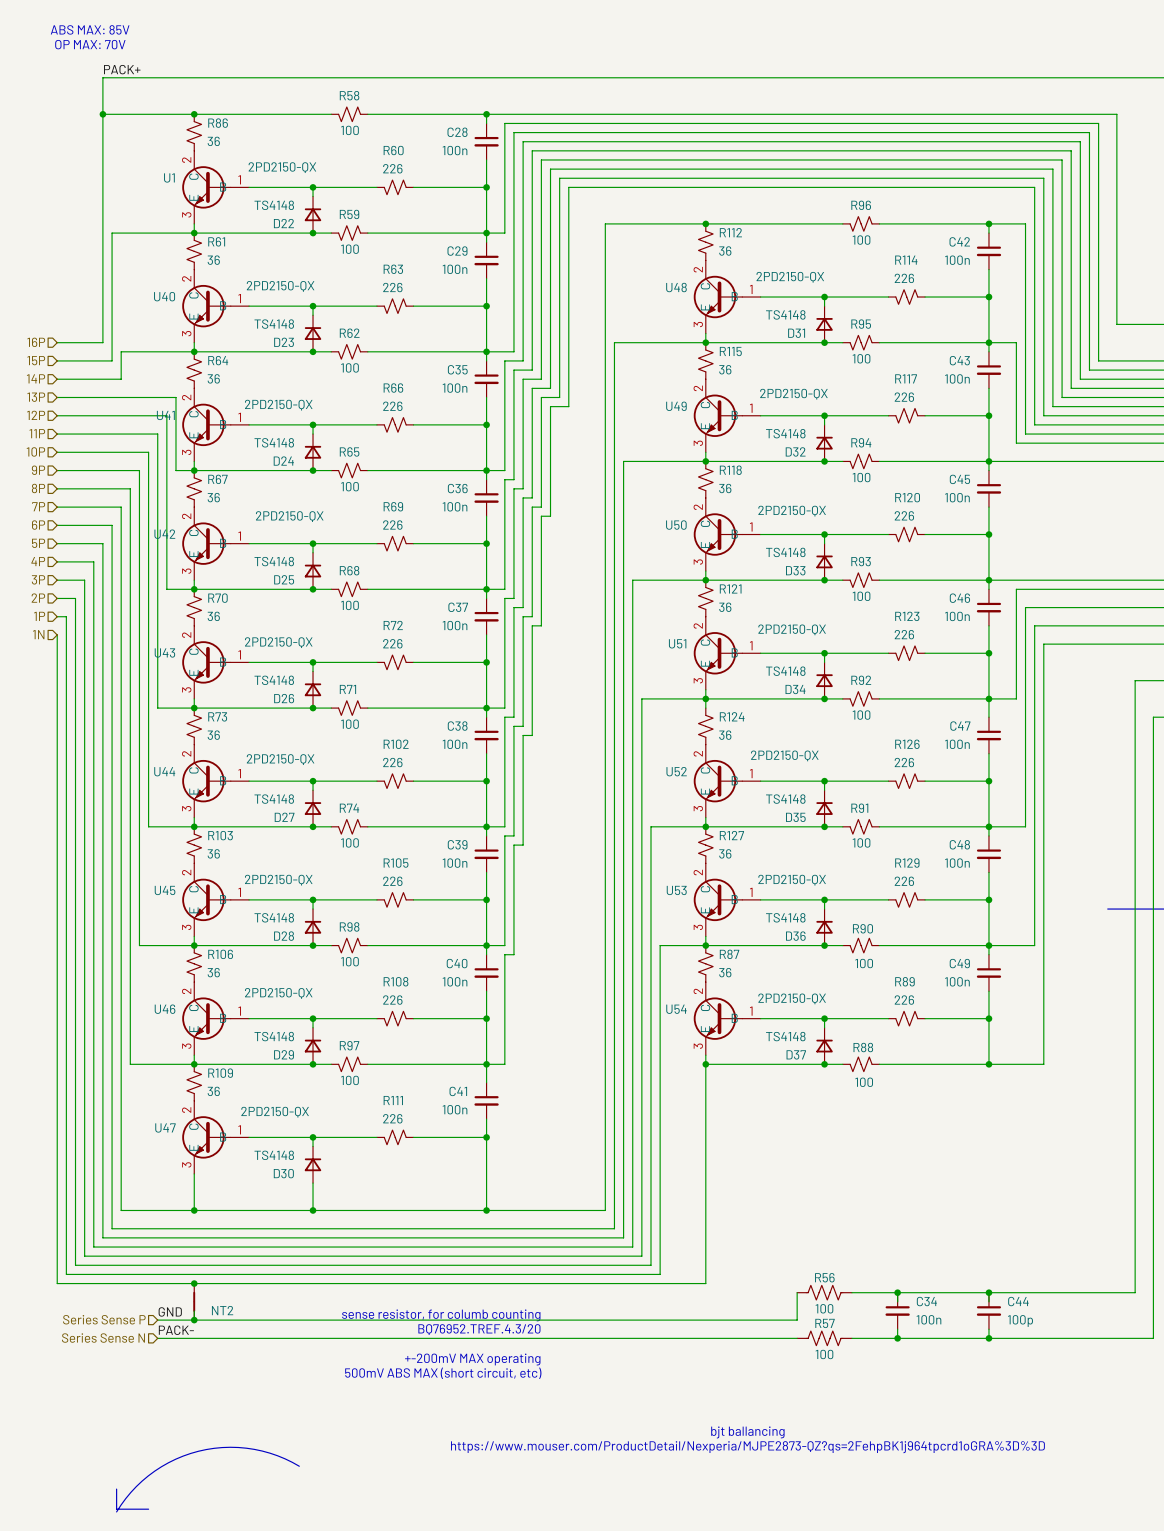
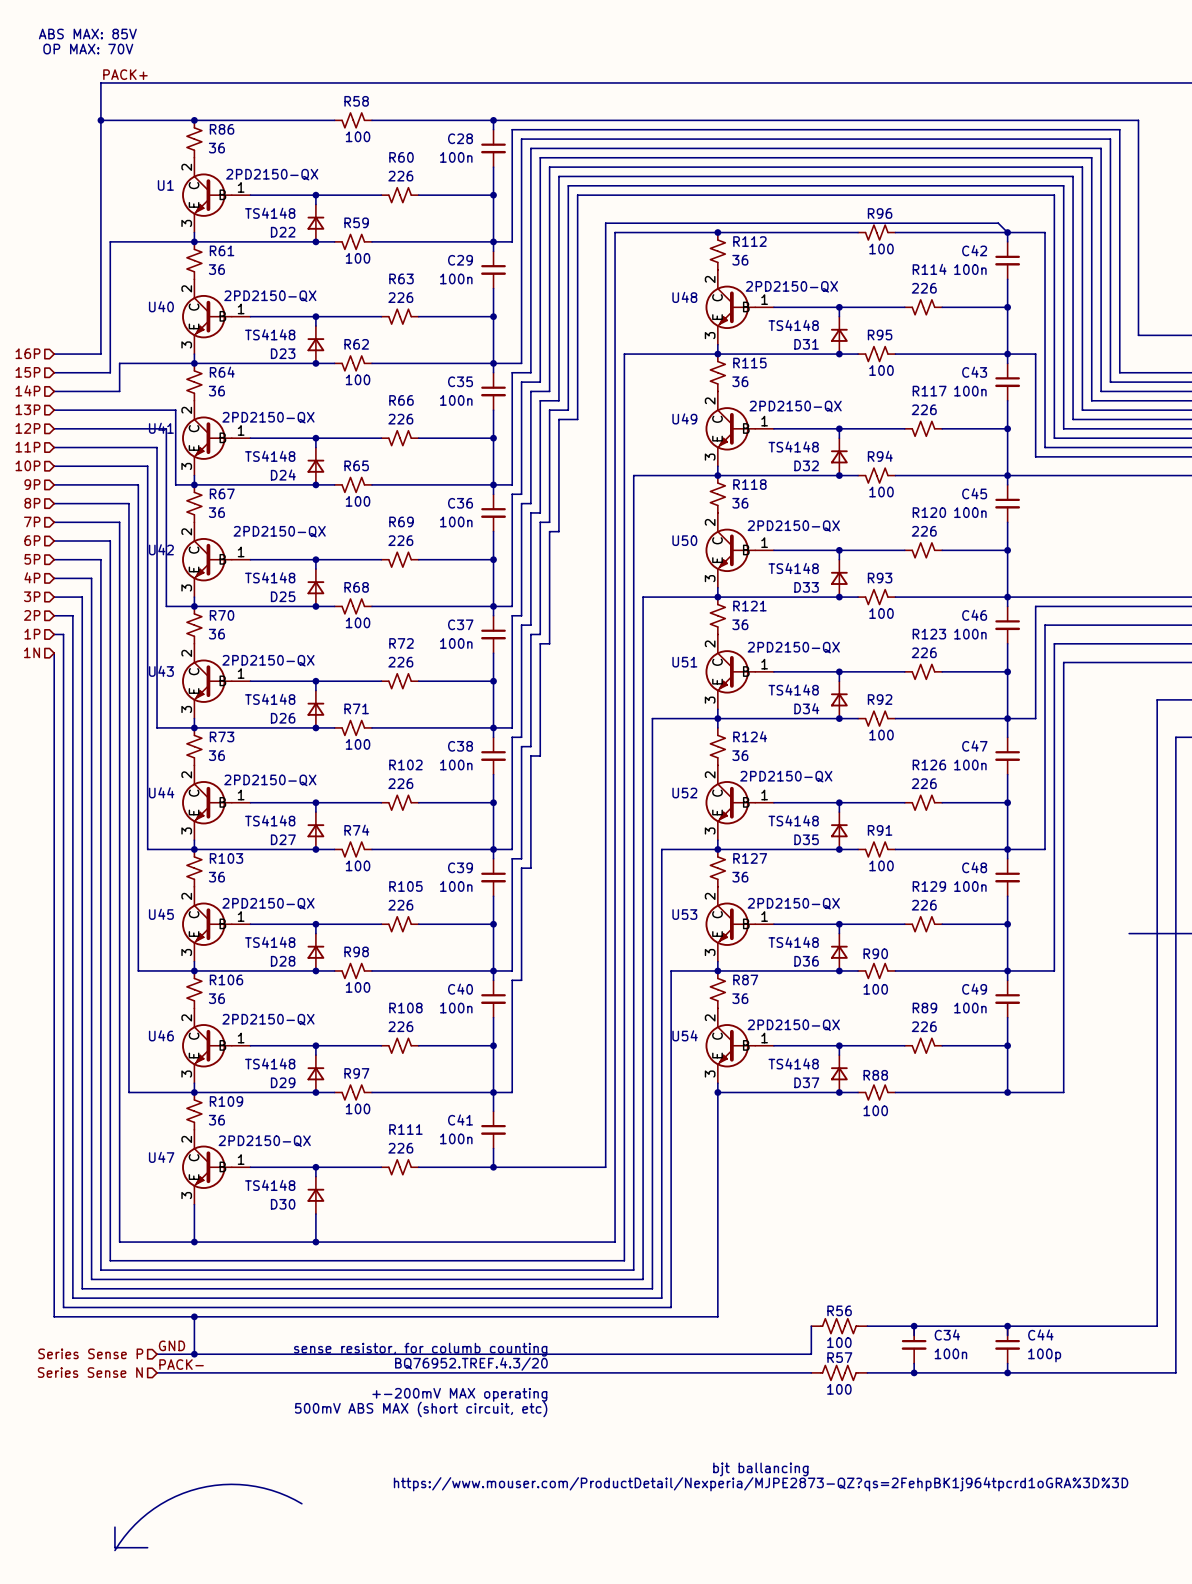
wire: (486, 1137) (486, 1210) -> (493, 1167) (605, 1167) (605, 223) (998, 223) (1007, 232)
junction: (486, 1210) -> none
NT2: (194, 1301) -> none

